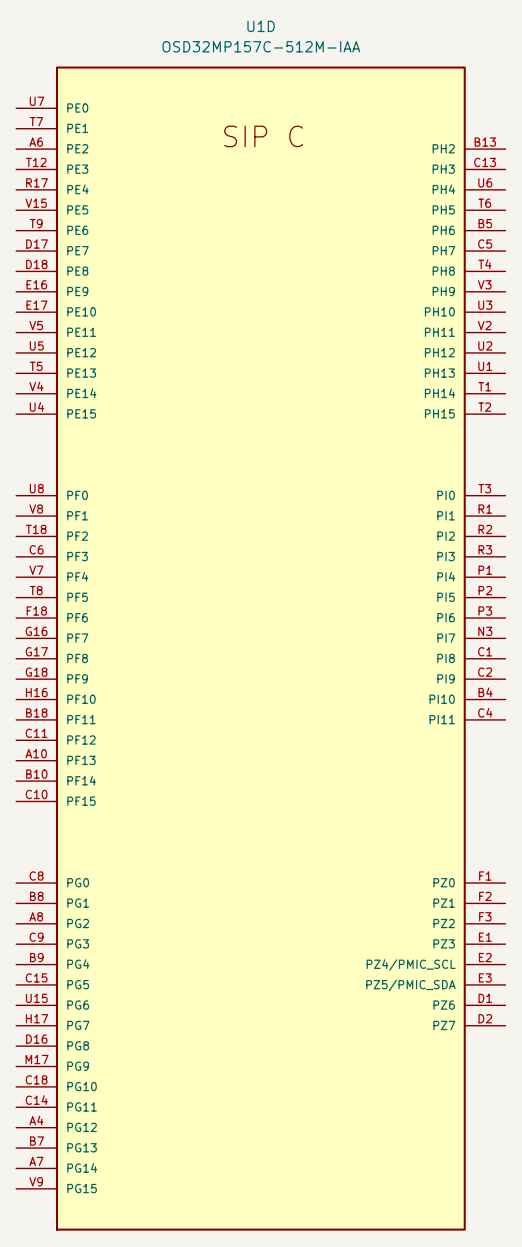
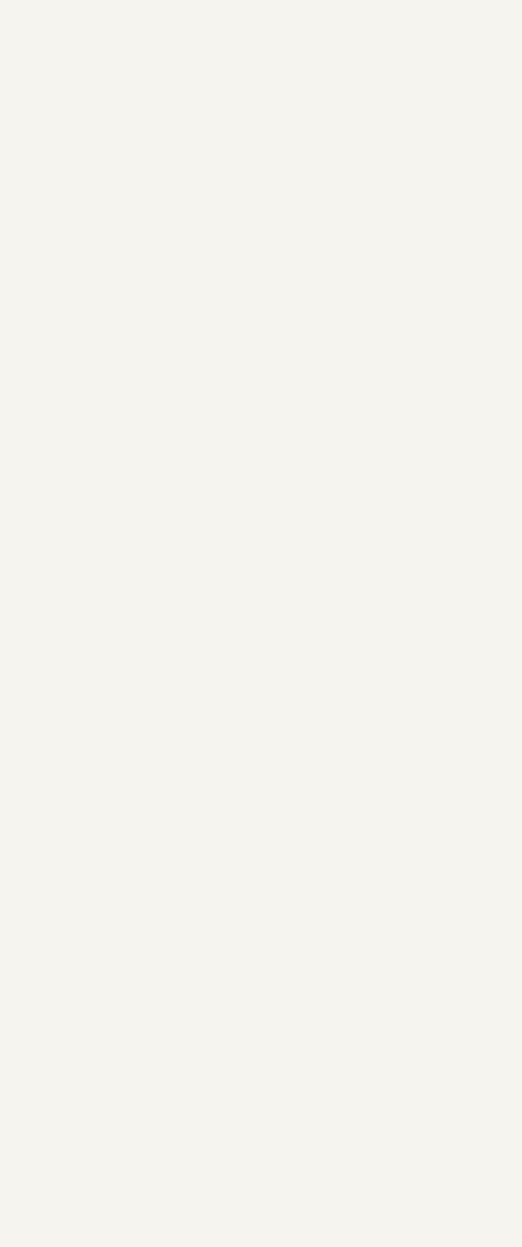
U1D: OSD32MP157C-512M-IAA (260, 648) -> none

